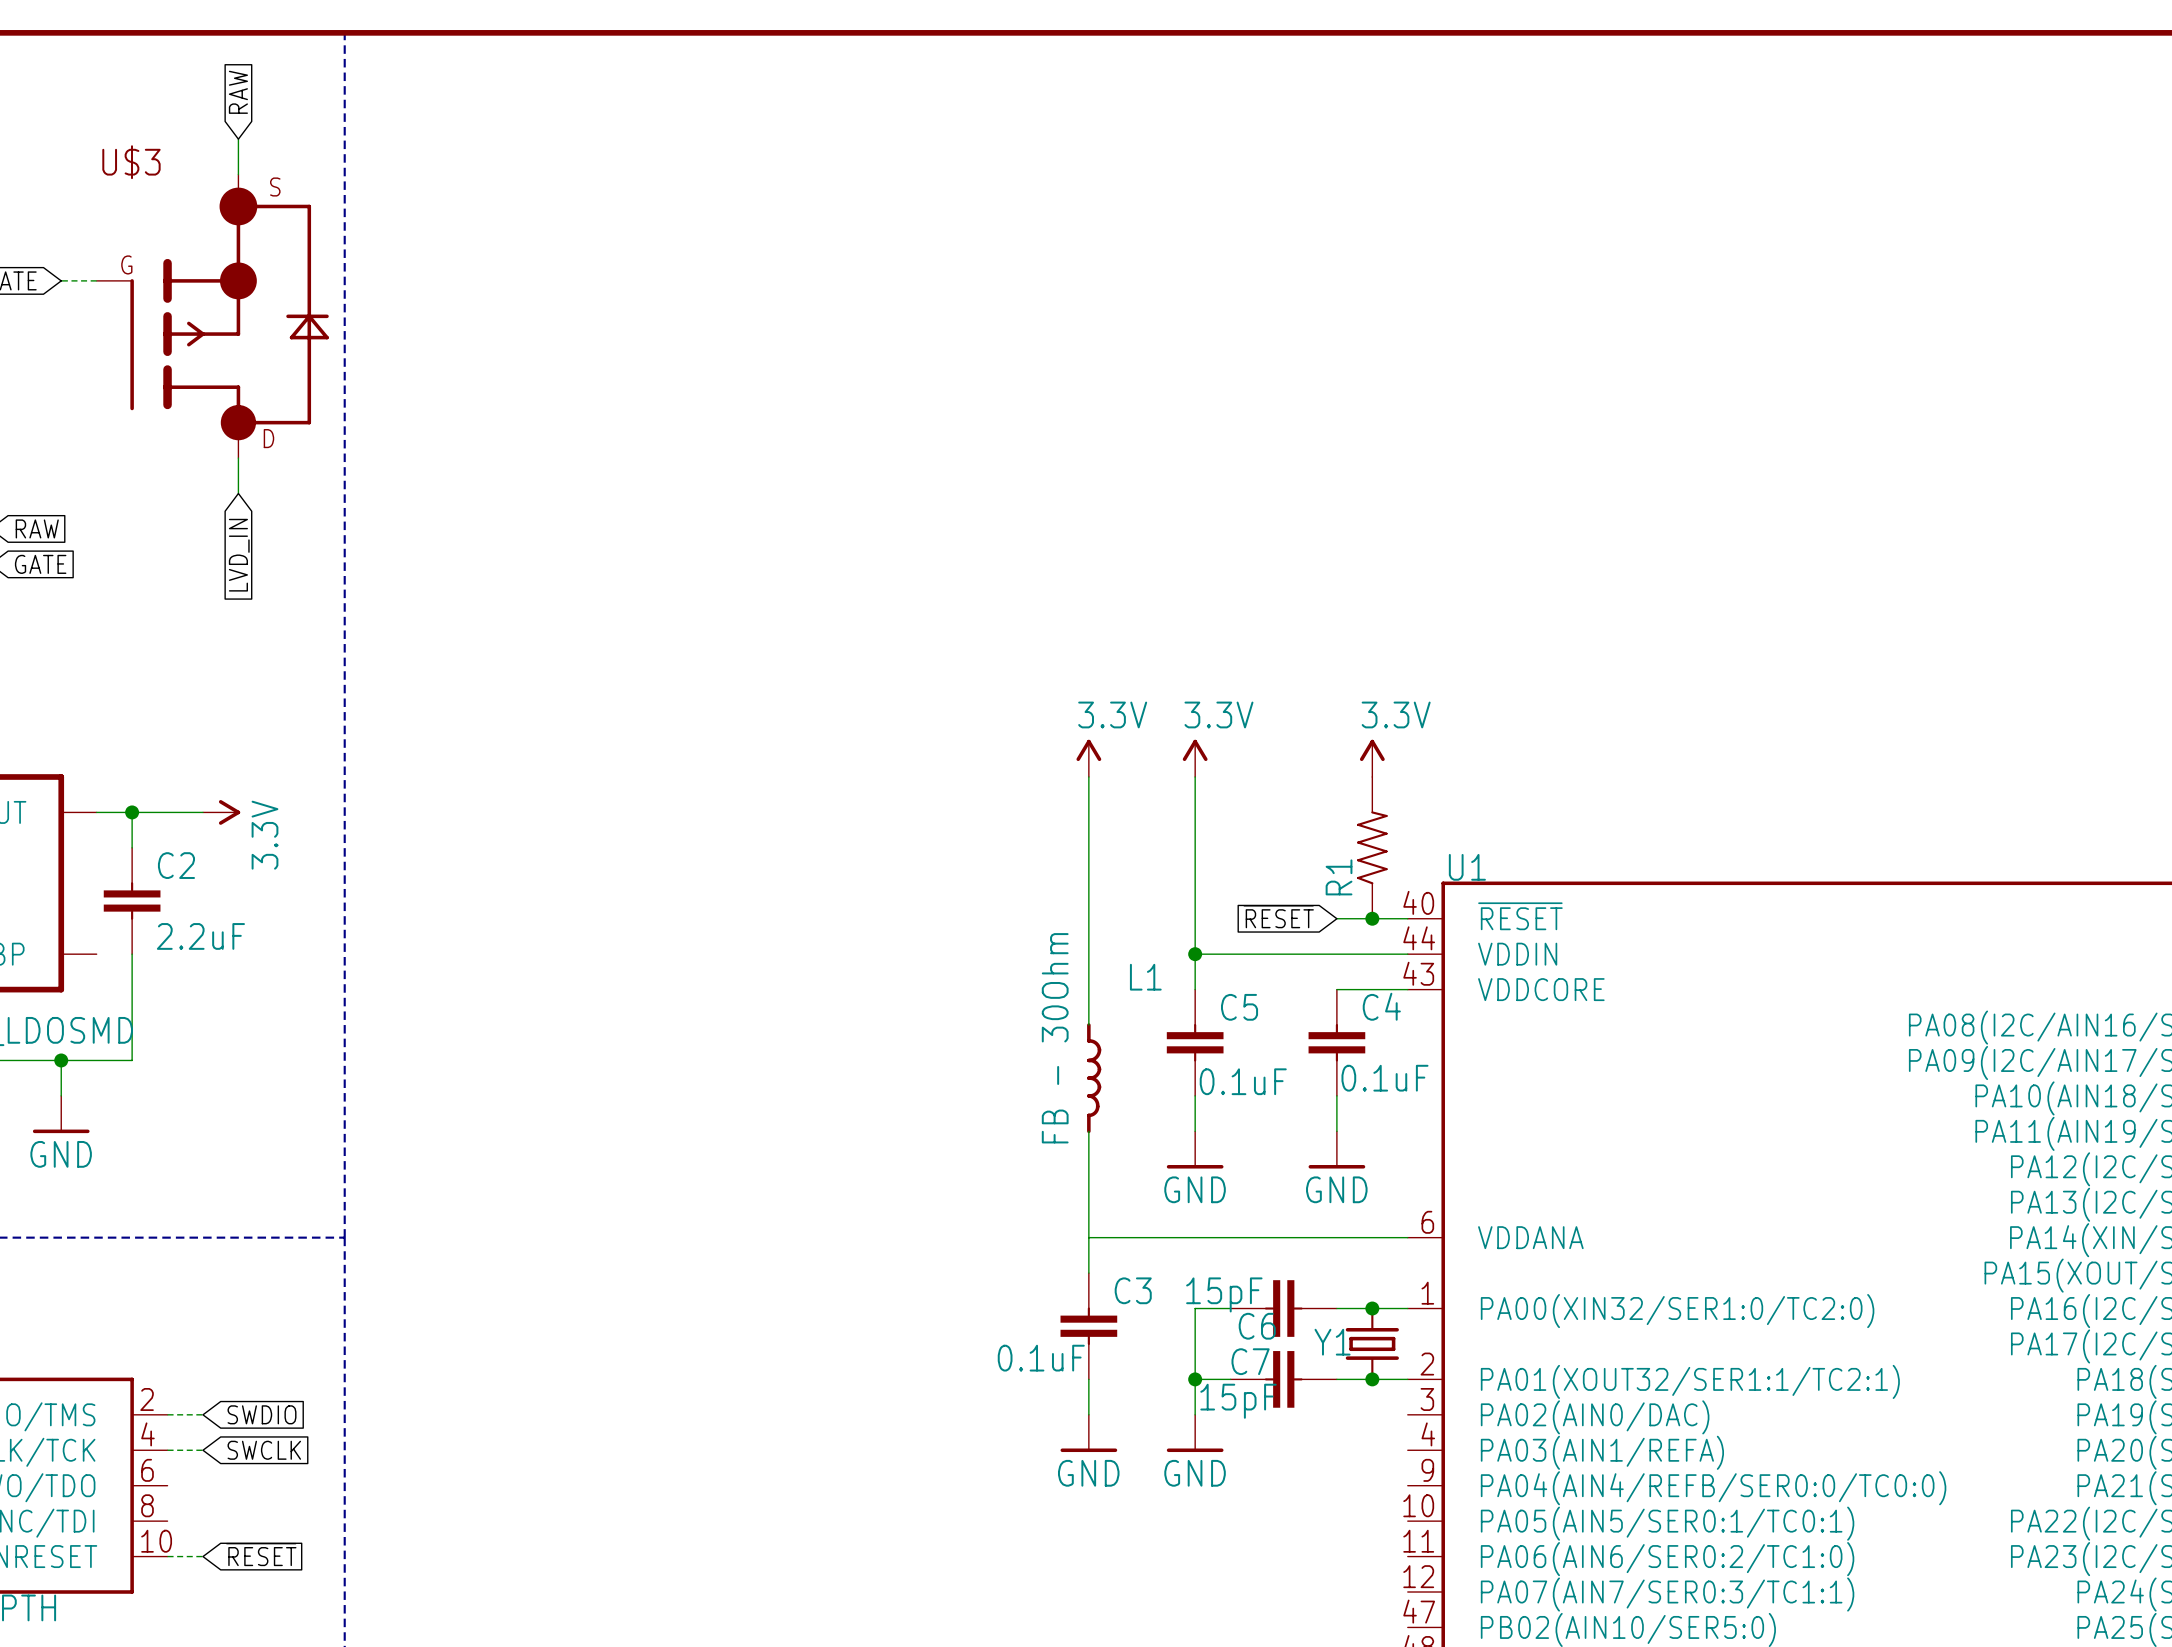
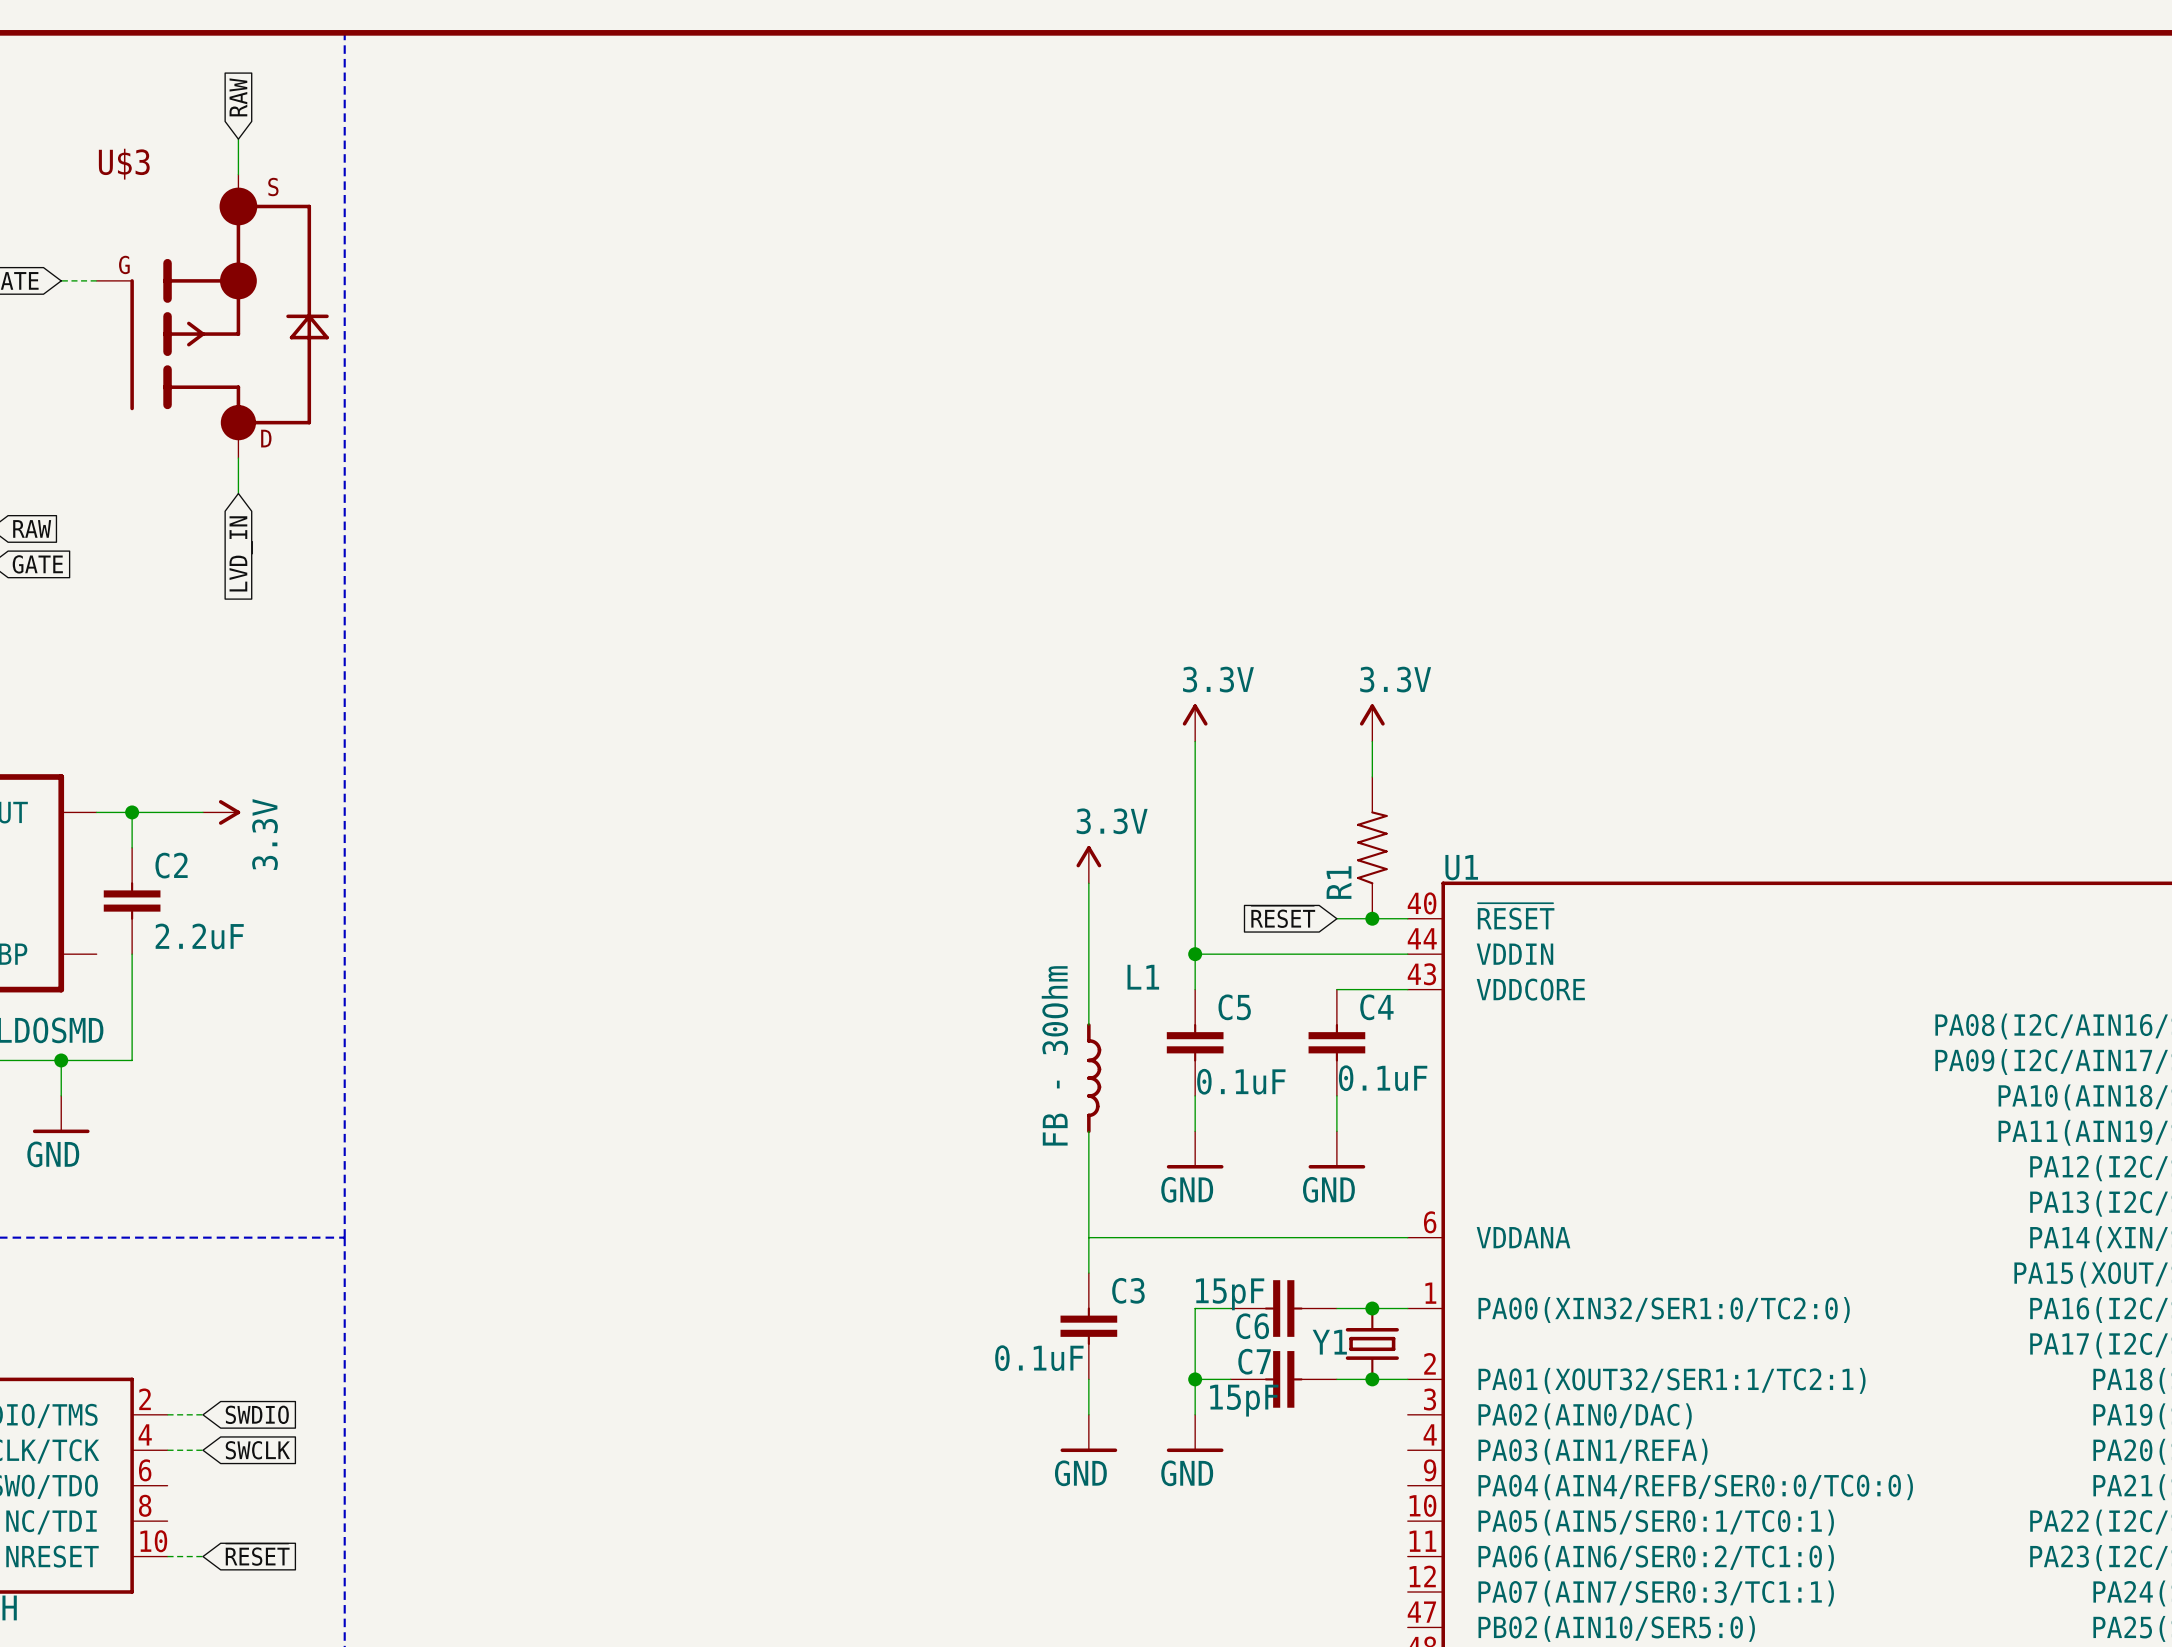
power symbol: 3.3V (1088, 758) -> none
power symbol position: 3.3V (1195, 758) -> 3.3V (1195, 722)
power symbol position: 3.3V (1372, 758) -> 3.3V (1372, 722)
wire: (1088, 776) (1088, 883) -> none
power symbol: none -> 3.3V (1088, 864)

